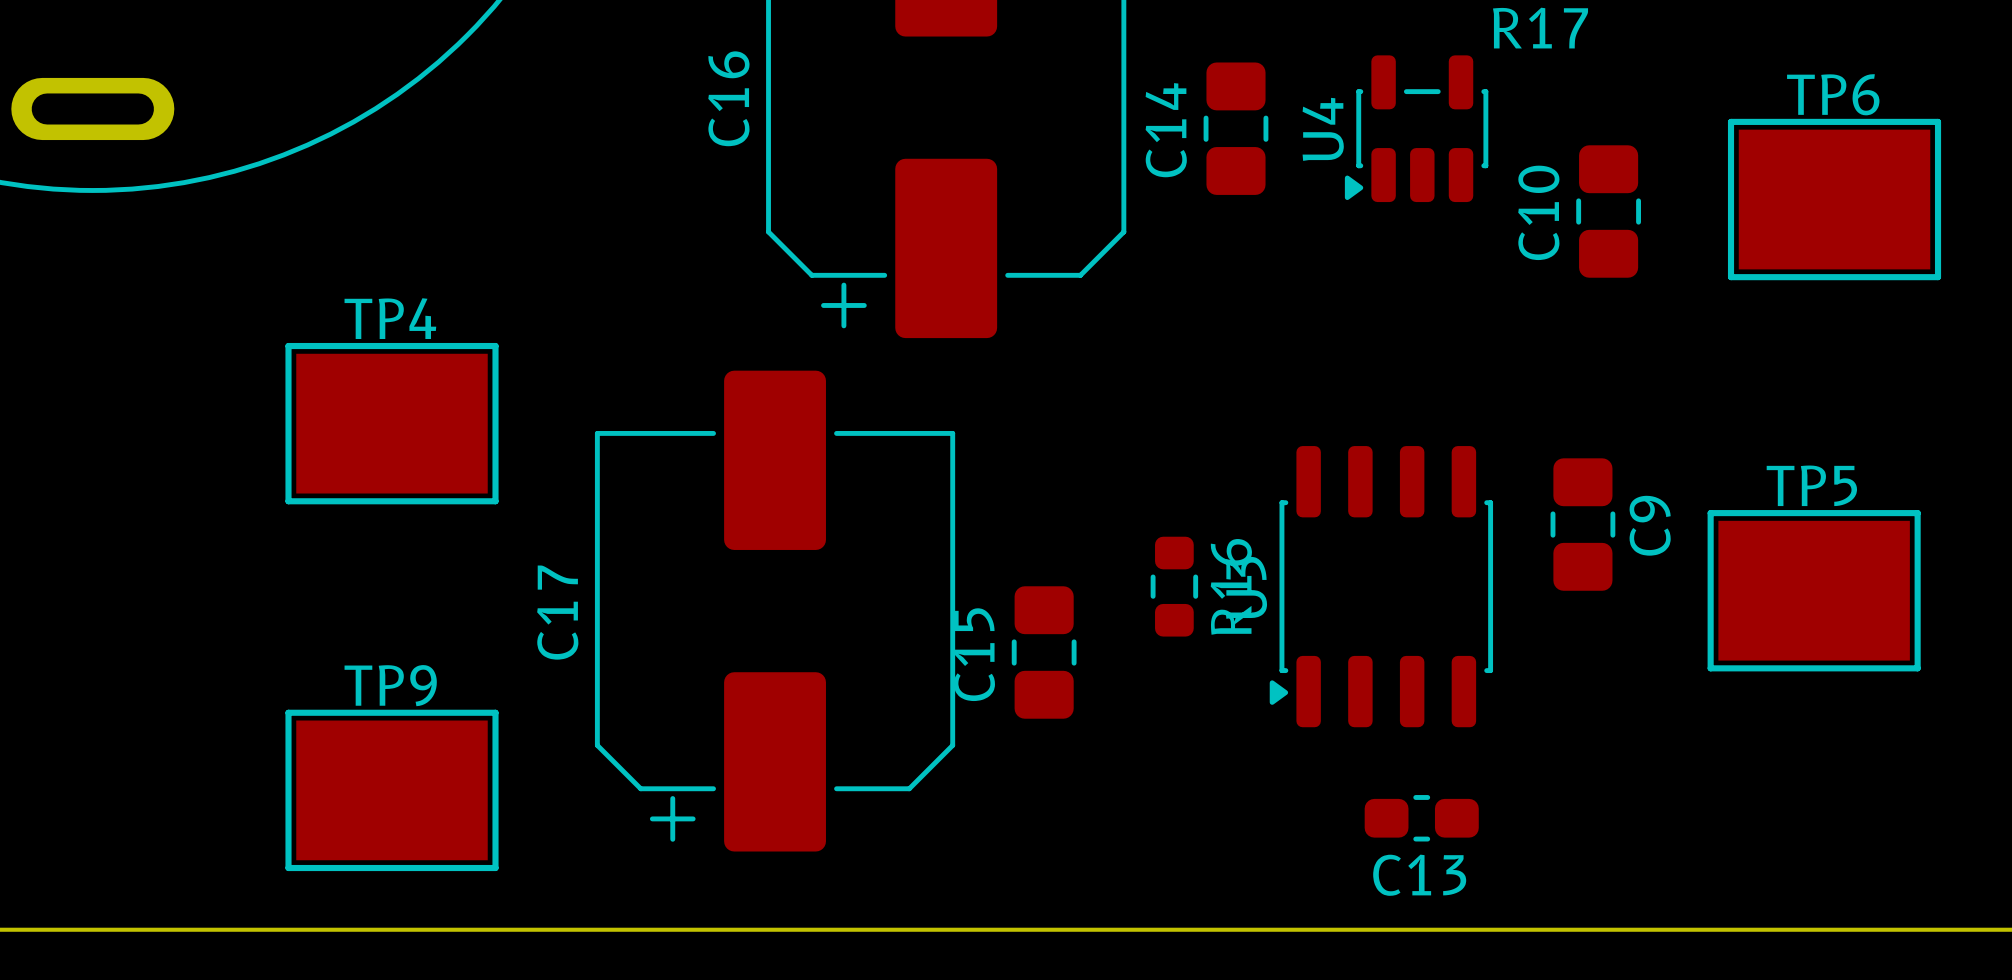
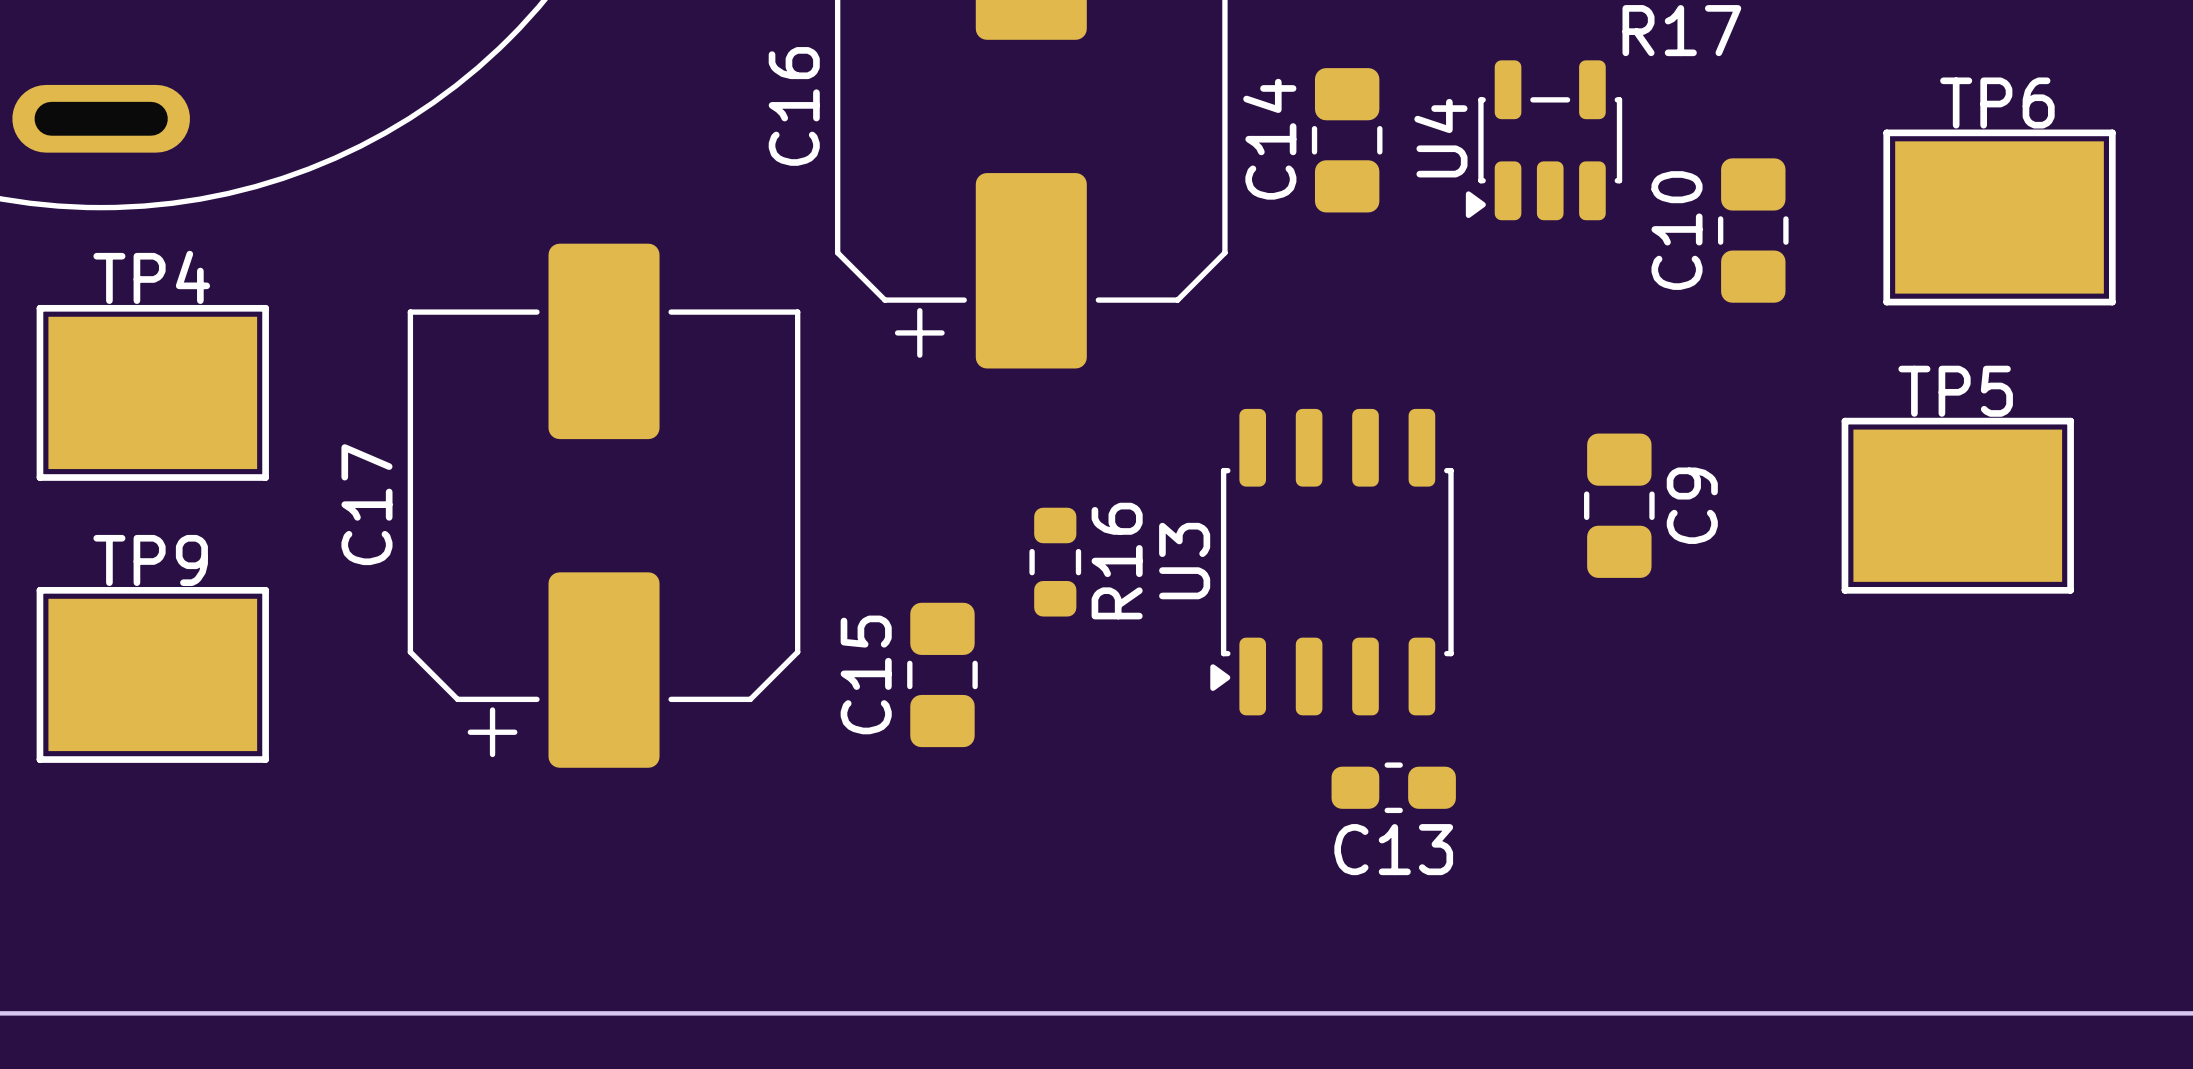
TP4 position: (392, 423) -> (152, 392)
C9 position: (1582, 524) -> (1619, 505)
R16 position: (1174, 586) -> (1055, 562)
U3 position: (1381, 586) -> (1331, 562)
TP5 position: (1814, 590) -> (1957, 505)
C17 position: (775, 611) -> (604, 505)
C15 position: (1044, 652) -> (942, 674)
TP9 position: (392, 790) -> (152, 674)
C13 position: (1421, 818) -> (1393, 787)

